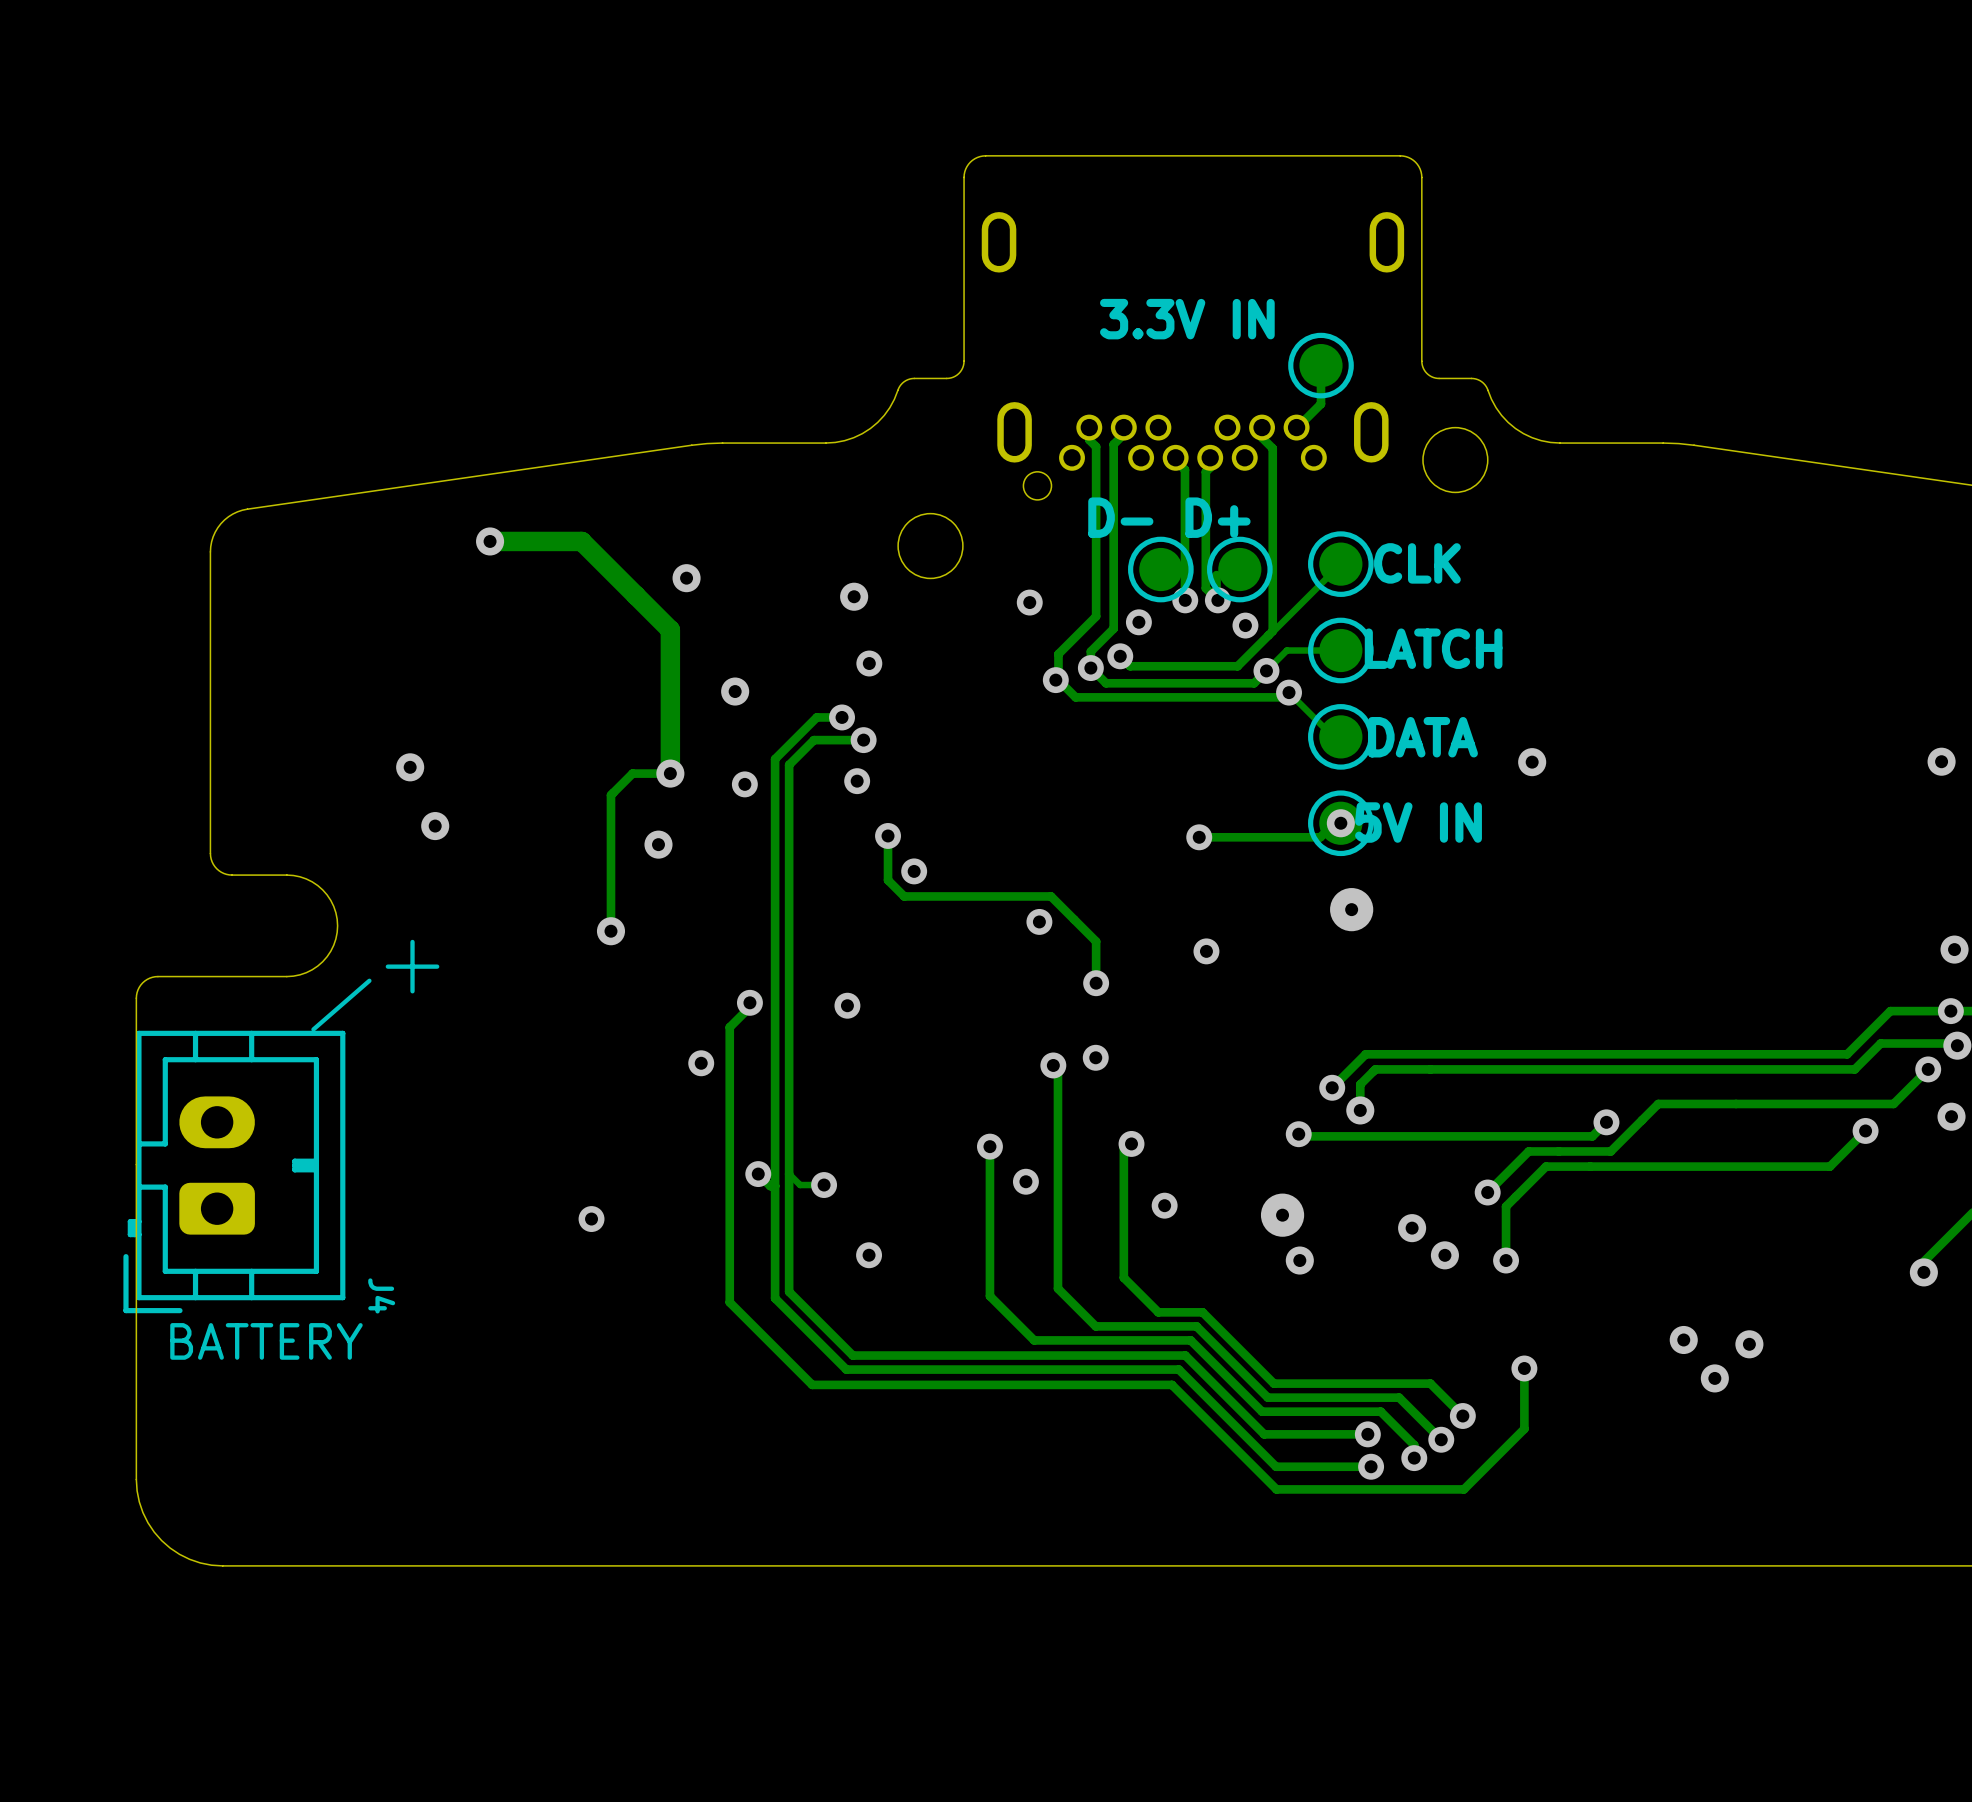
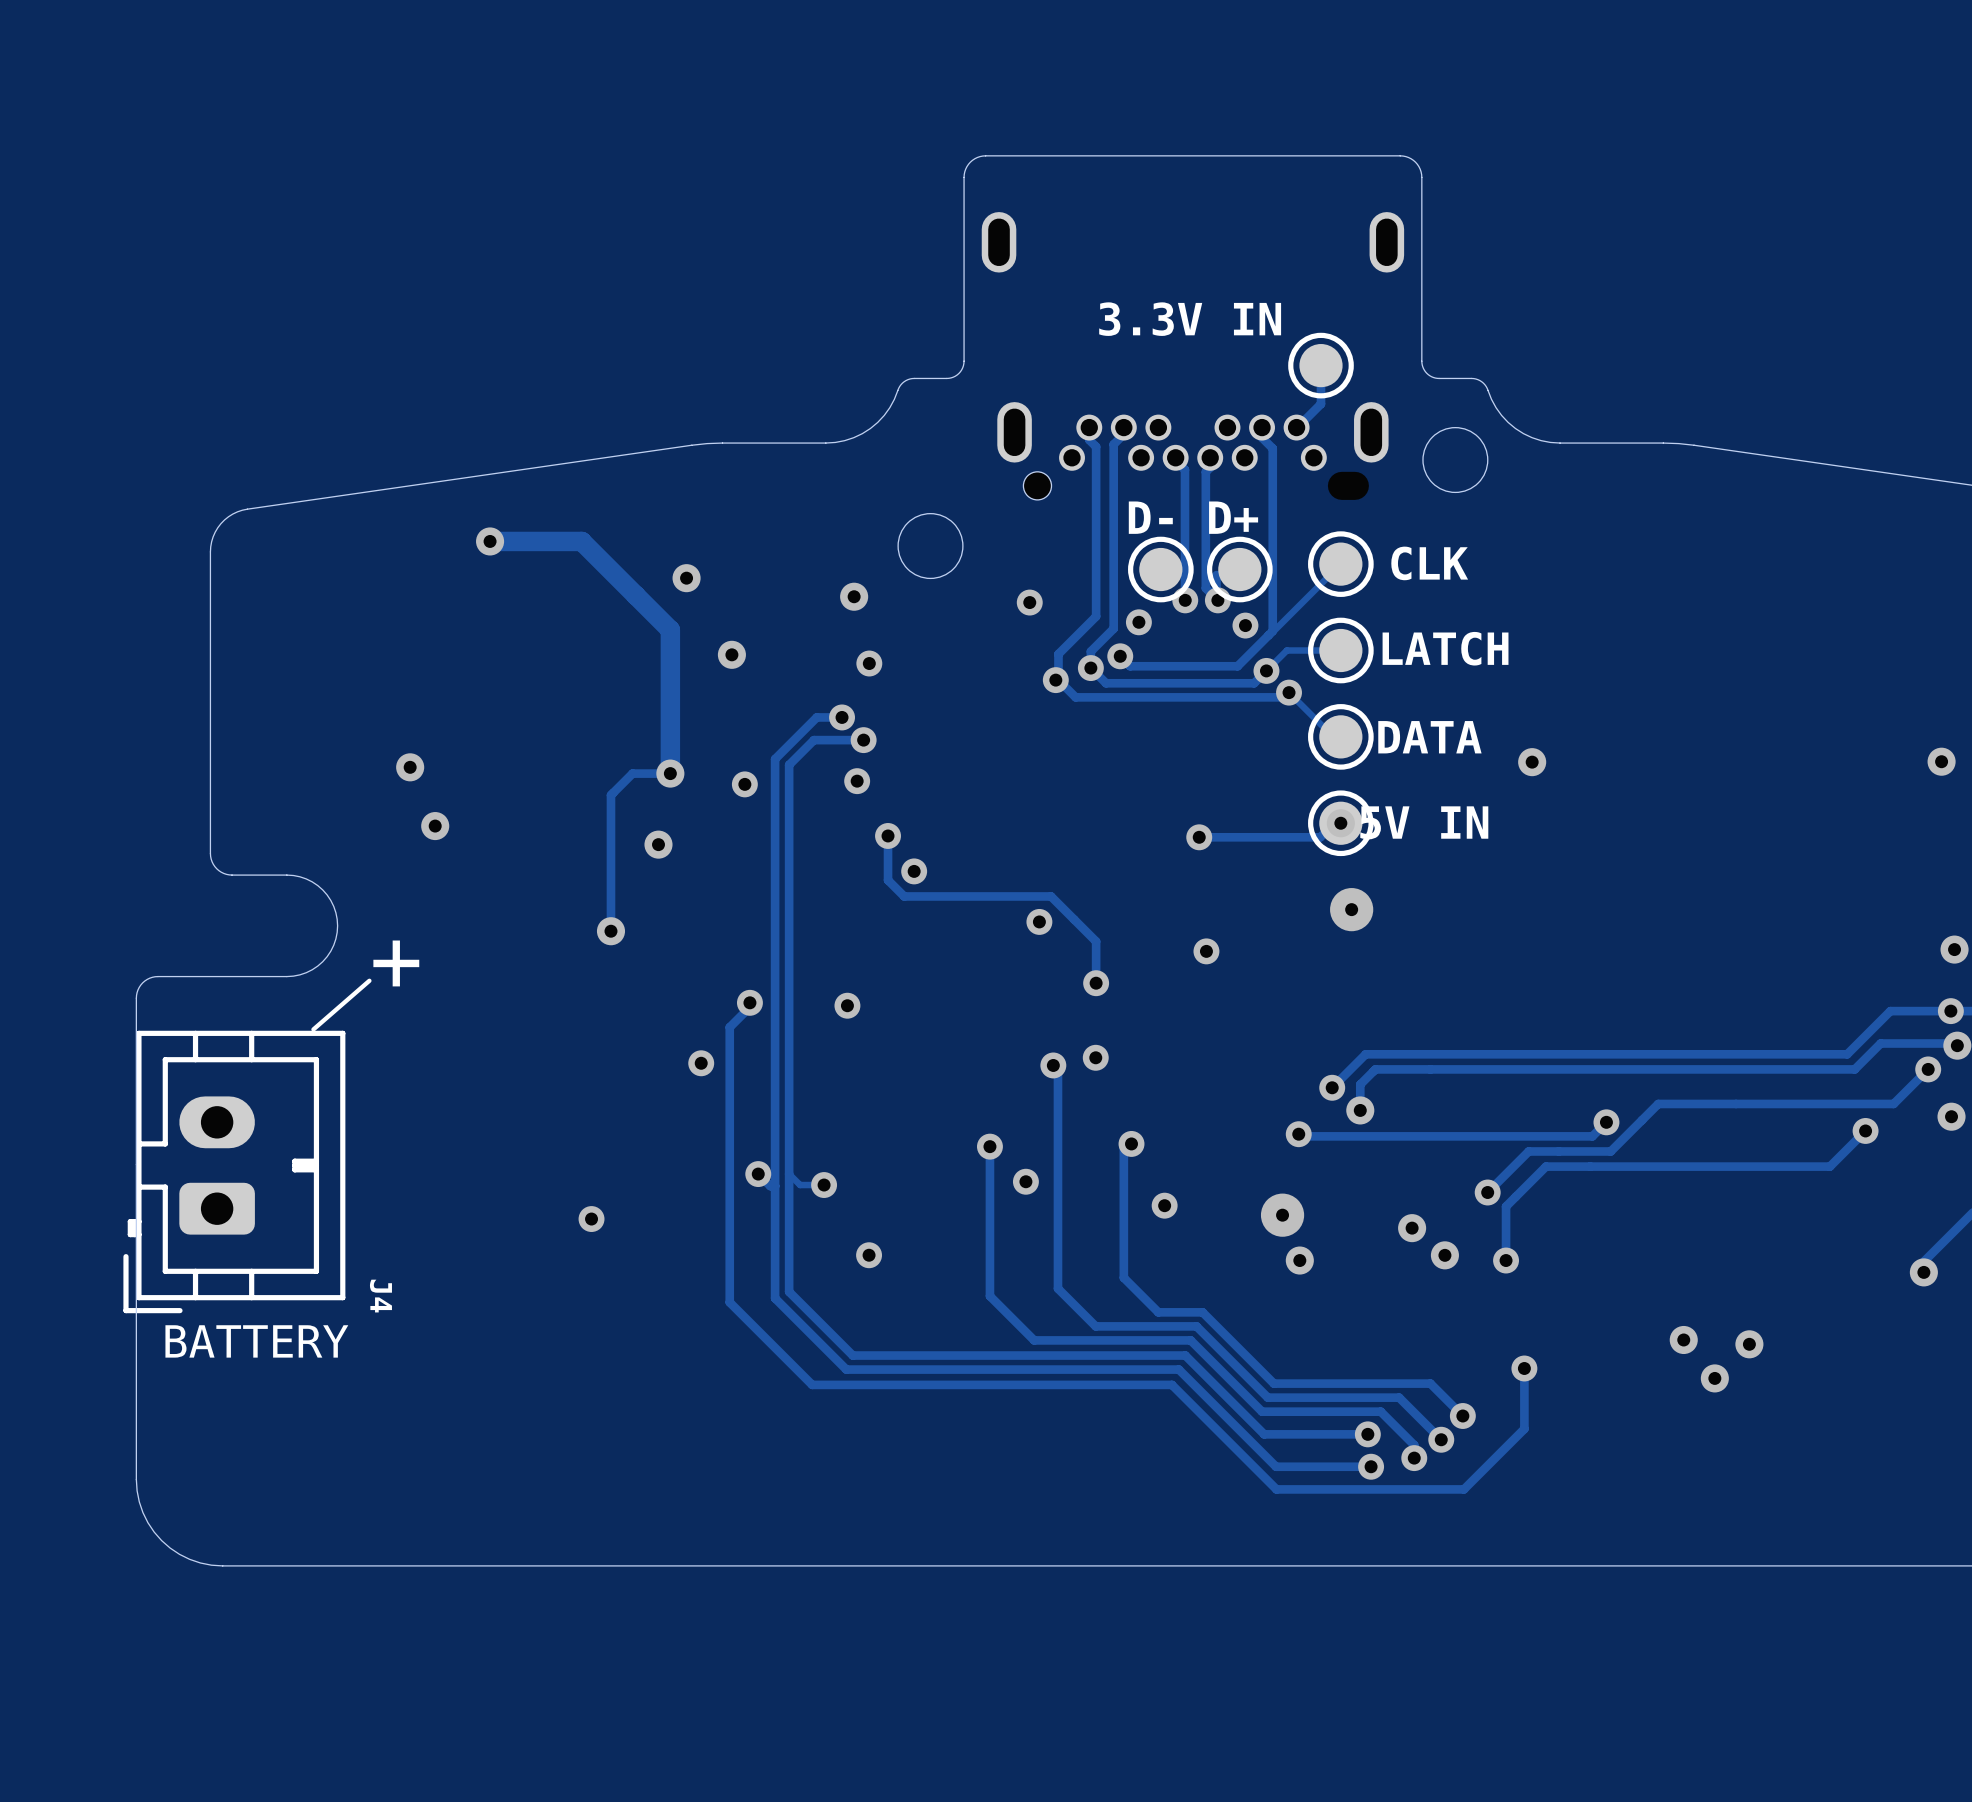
via position: (735, 691) -> (731, 654)

